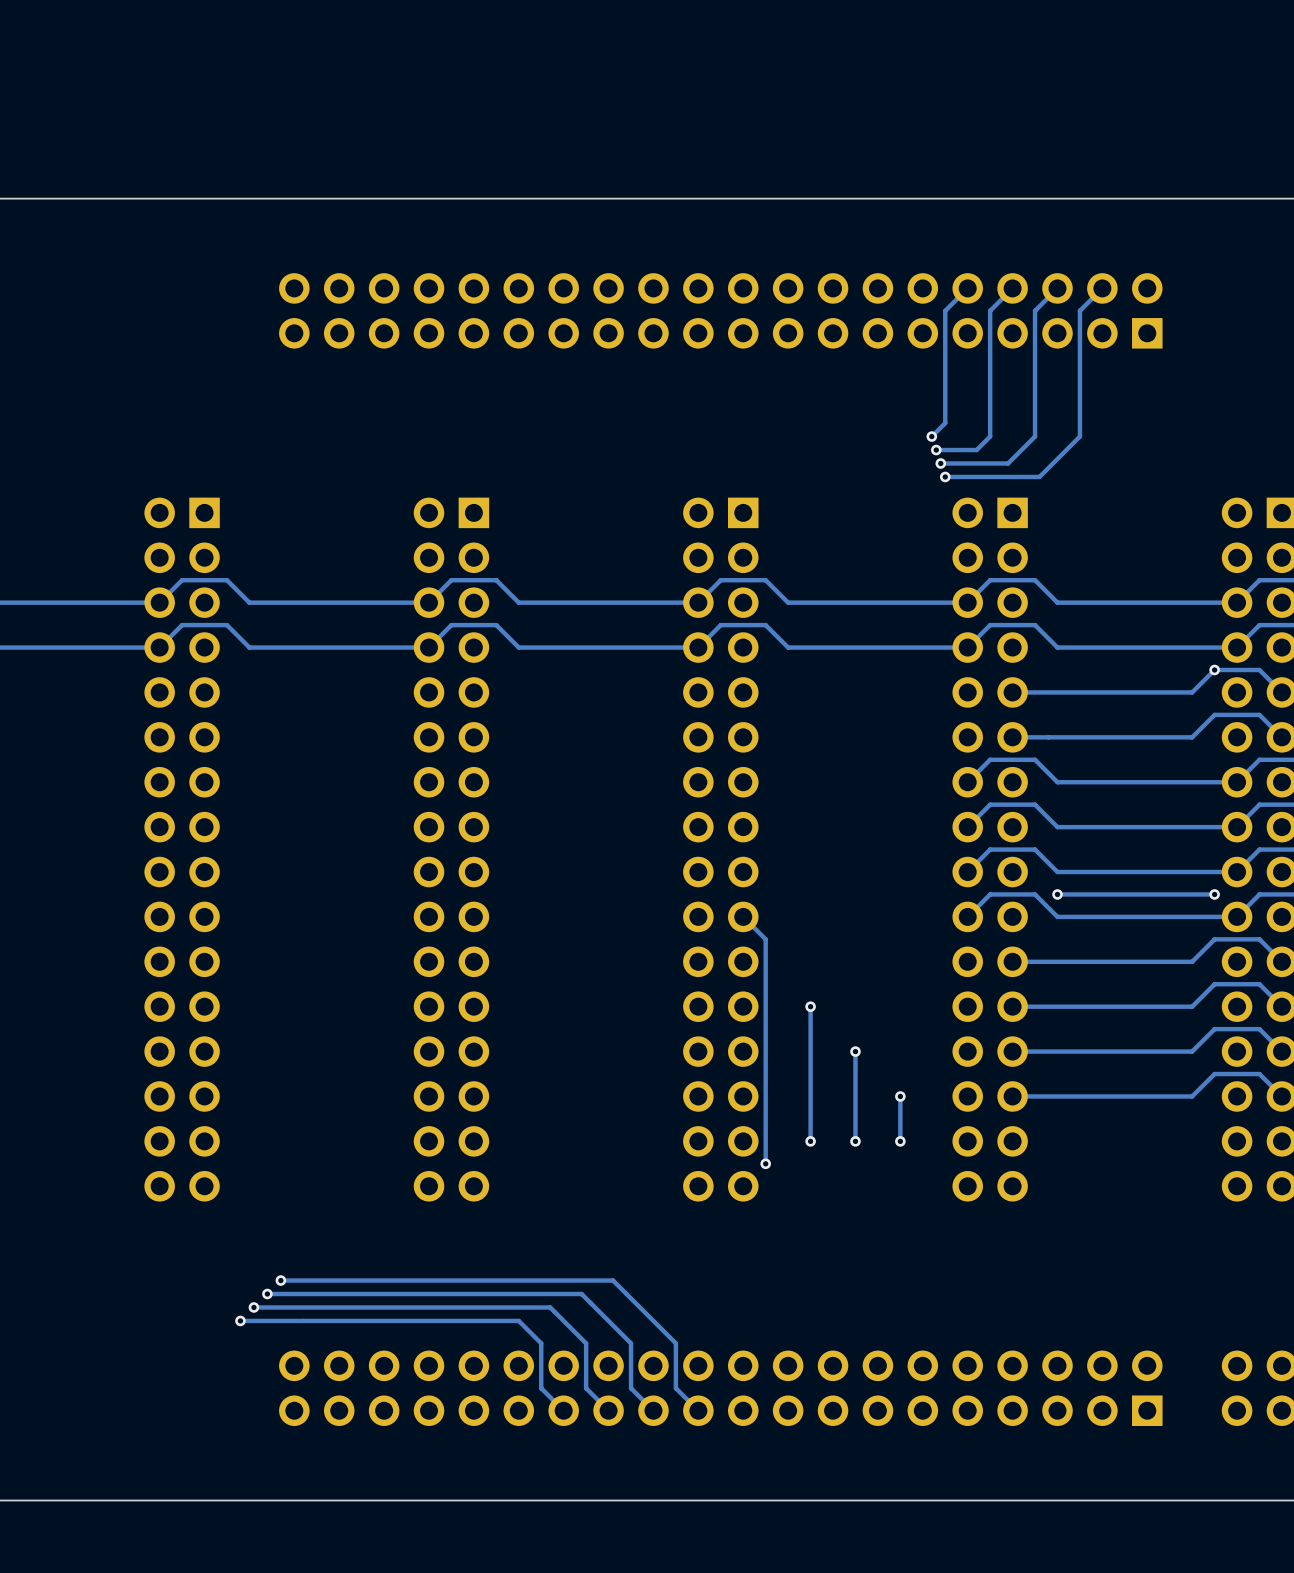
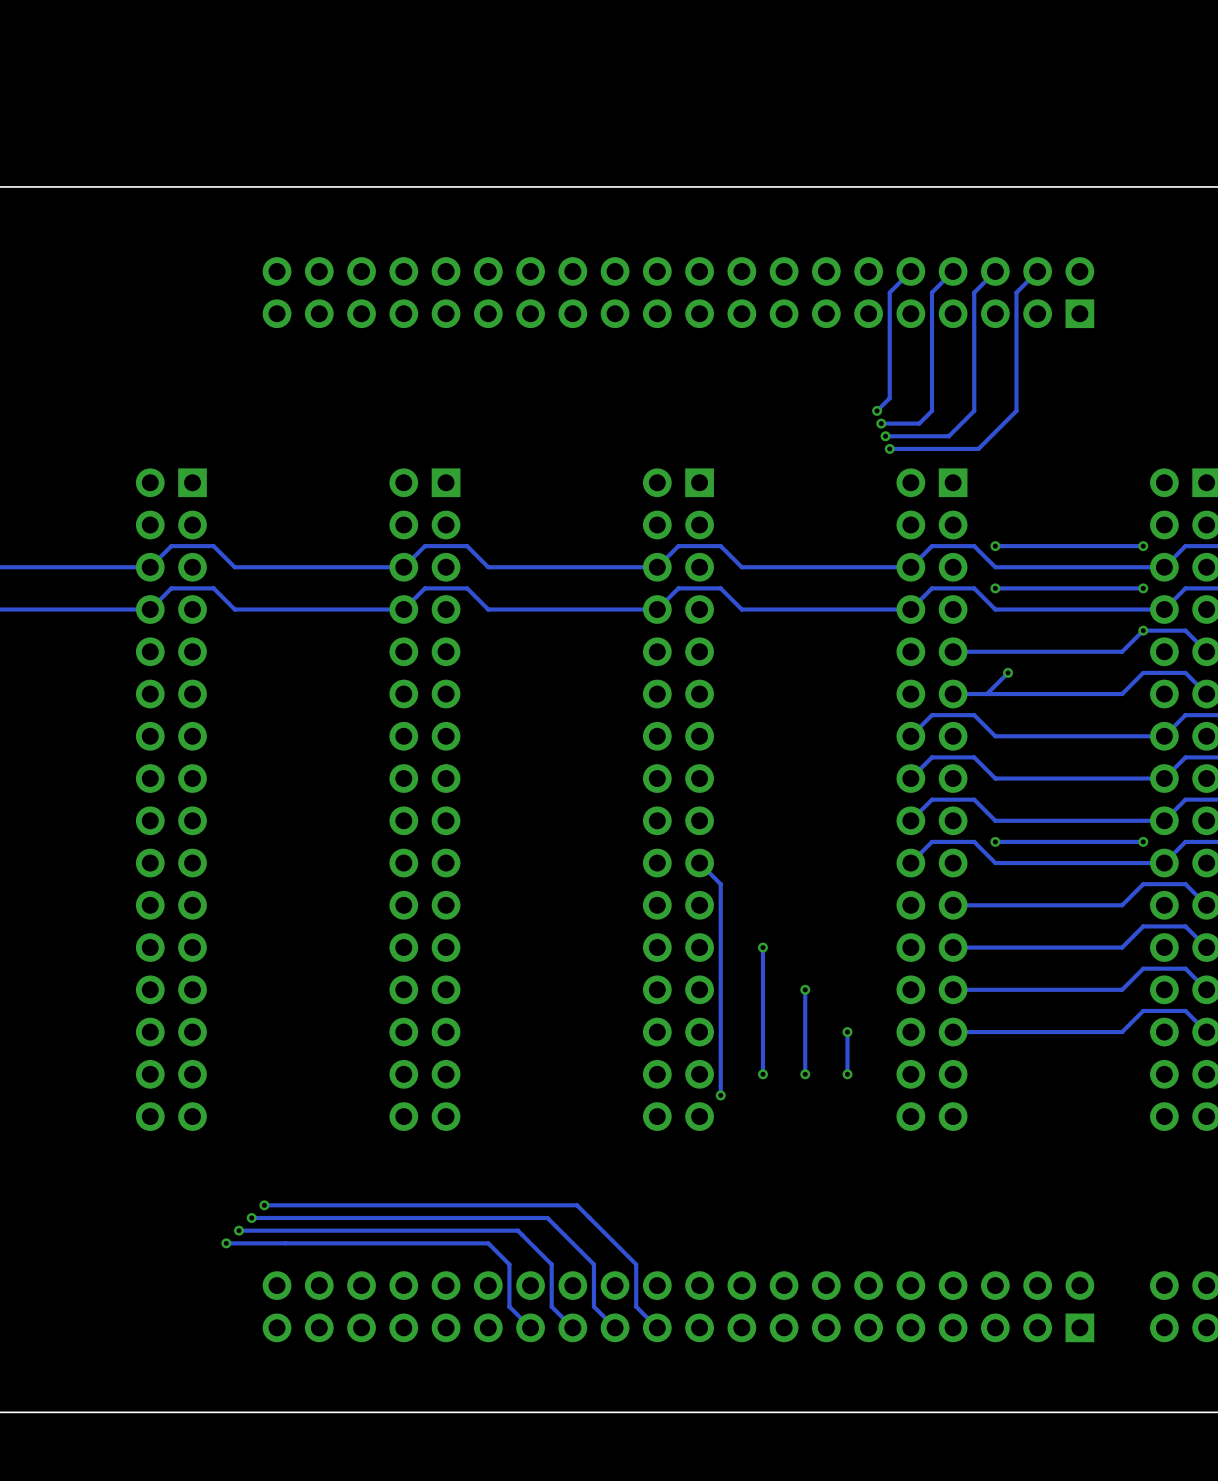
via: none -> (995, 546)
track: none -> (1143, 546) (995, 546)
via: none -> (1143, 546)
via: none -> (995, 588)
track: none -> (1143, 588) (995, 588)
via: none -> (1143, 588)
track: none -> (1008, 672) (986, 694)
via: none -> (1008, 672)

